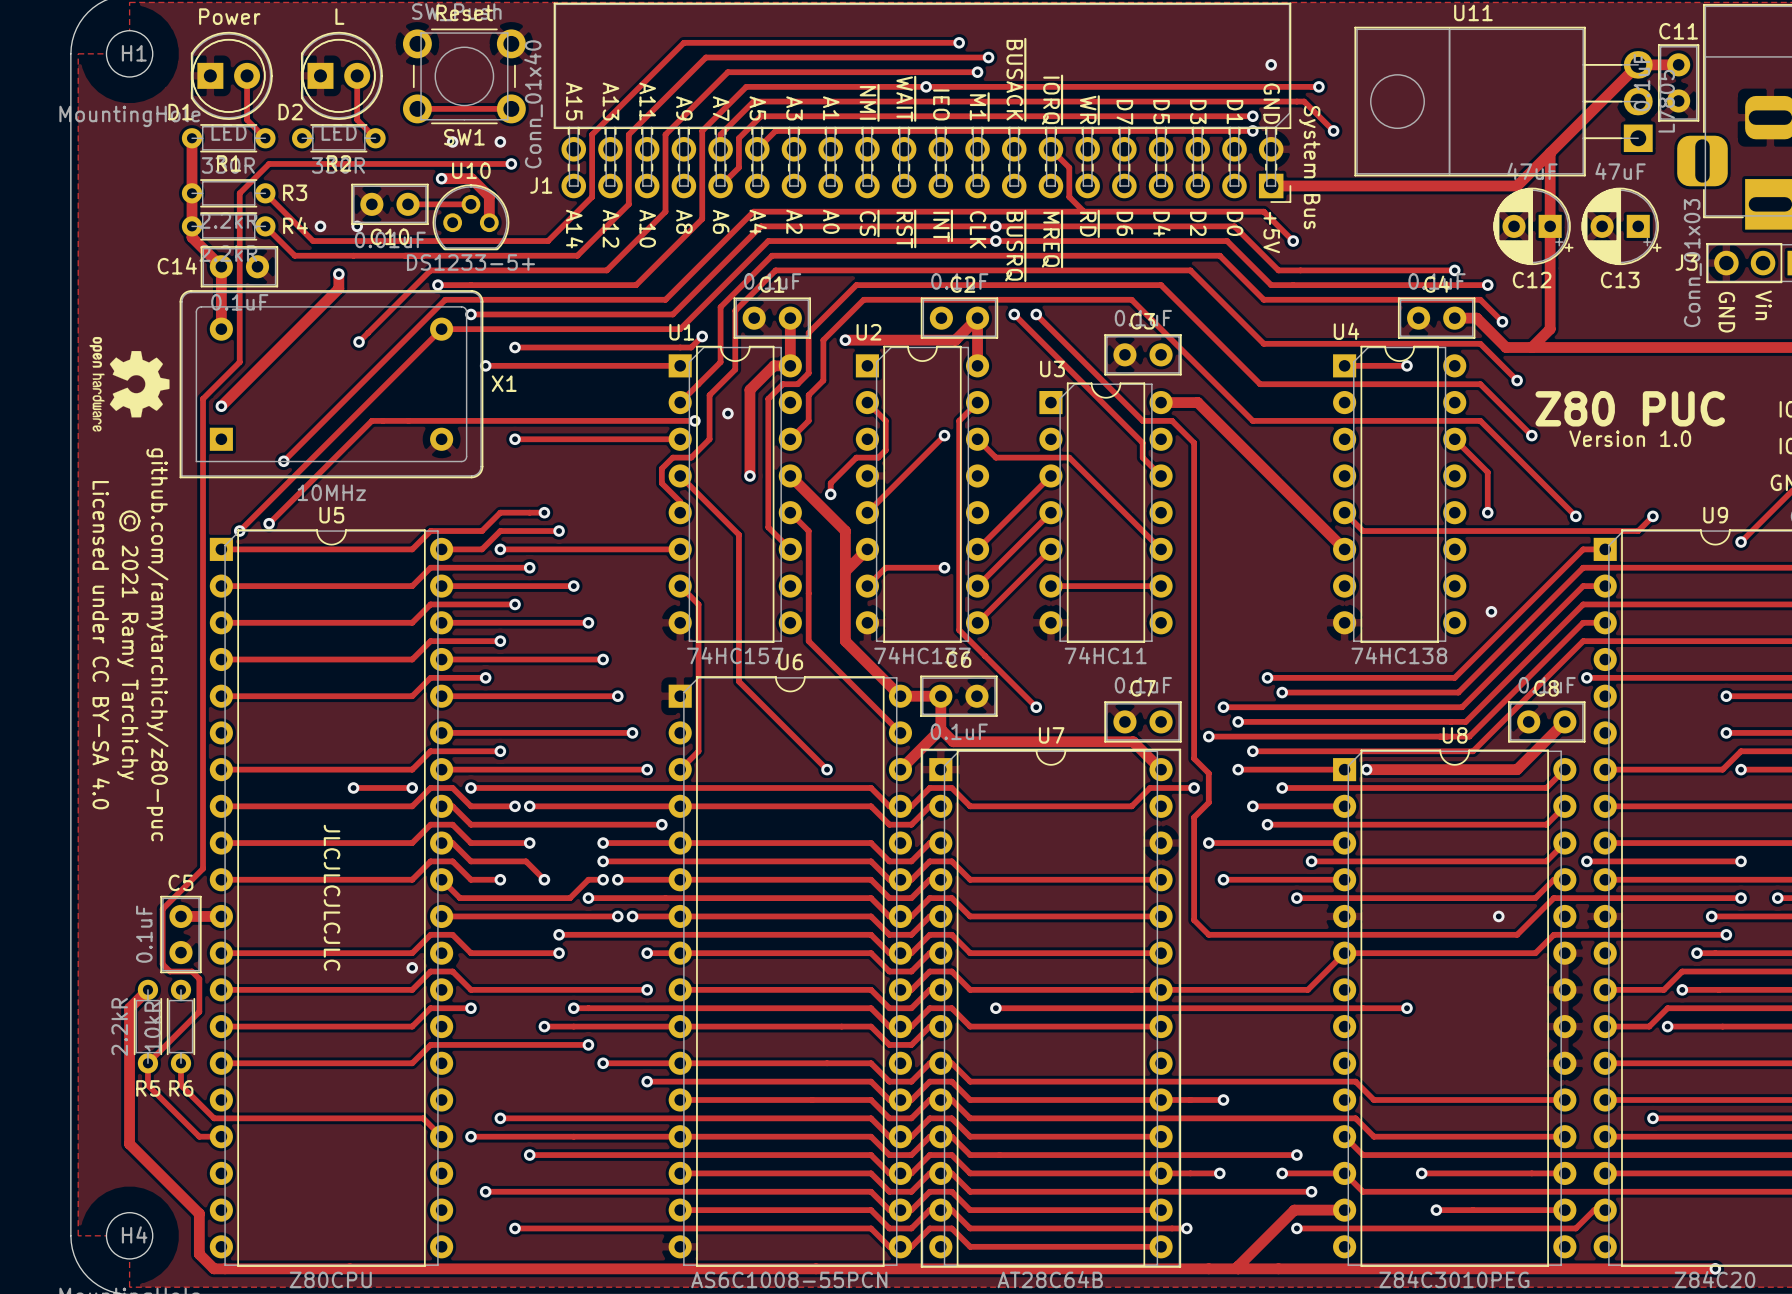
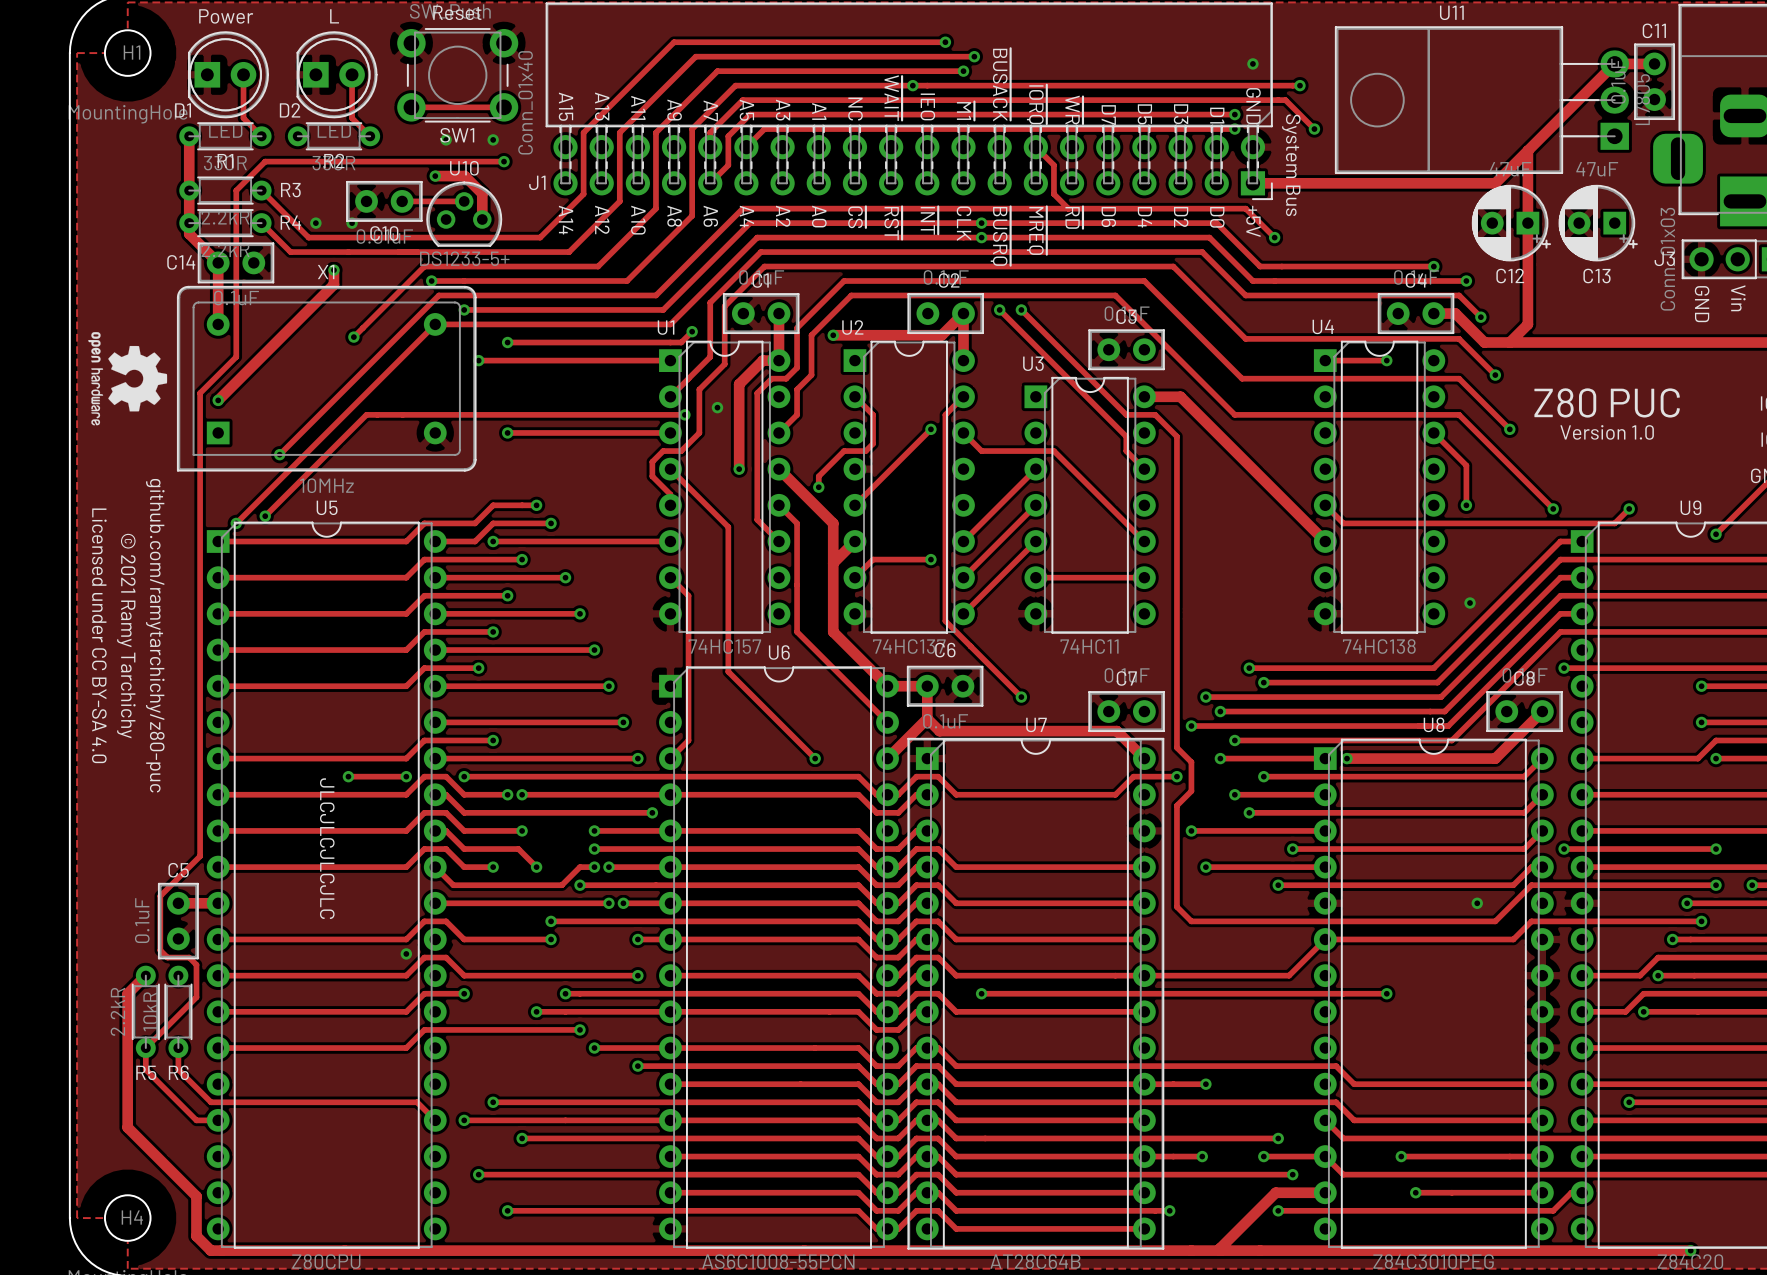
text: ~{NMI} (869, 102) -> NC (855, 109)
X1 name position: X1 (504, 383) -> X1 (326, 272)
text position: JLCJLCJLCJLC (332, 897) -> JLCJLCJLCJLC (327, 848)

